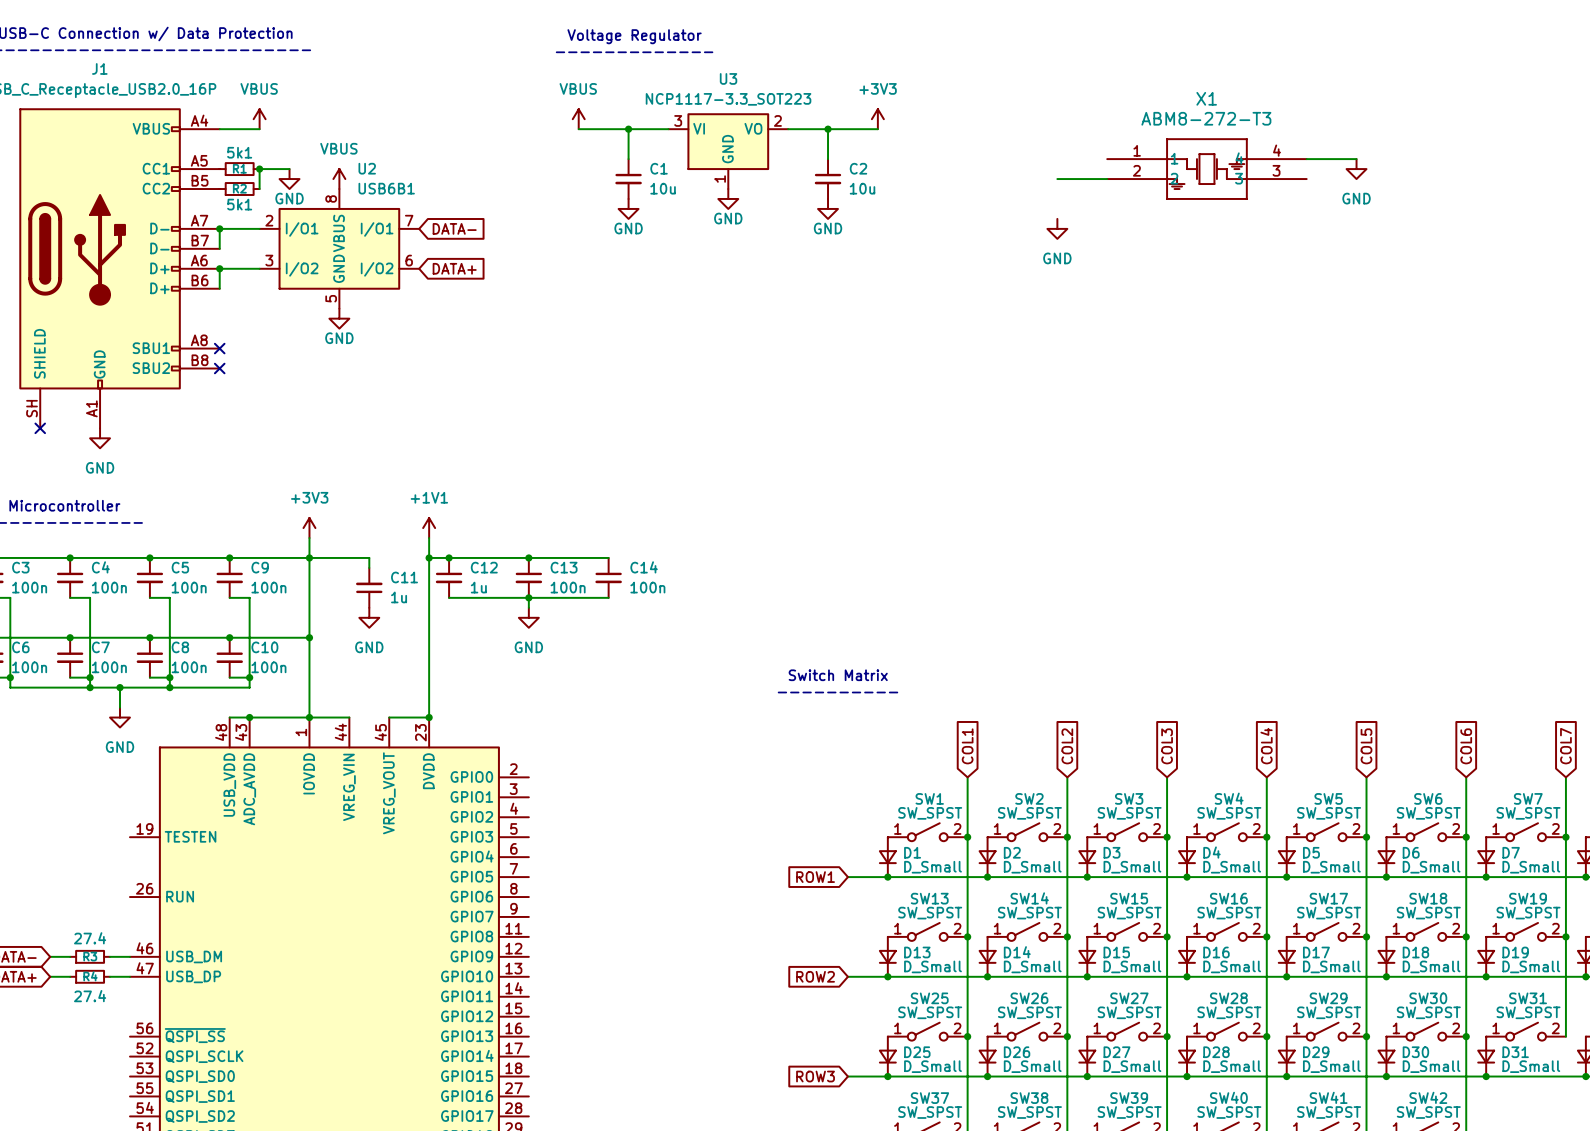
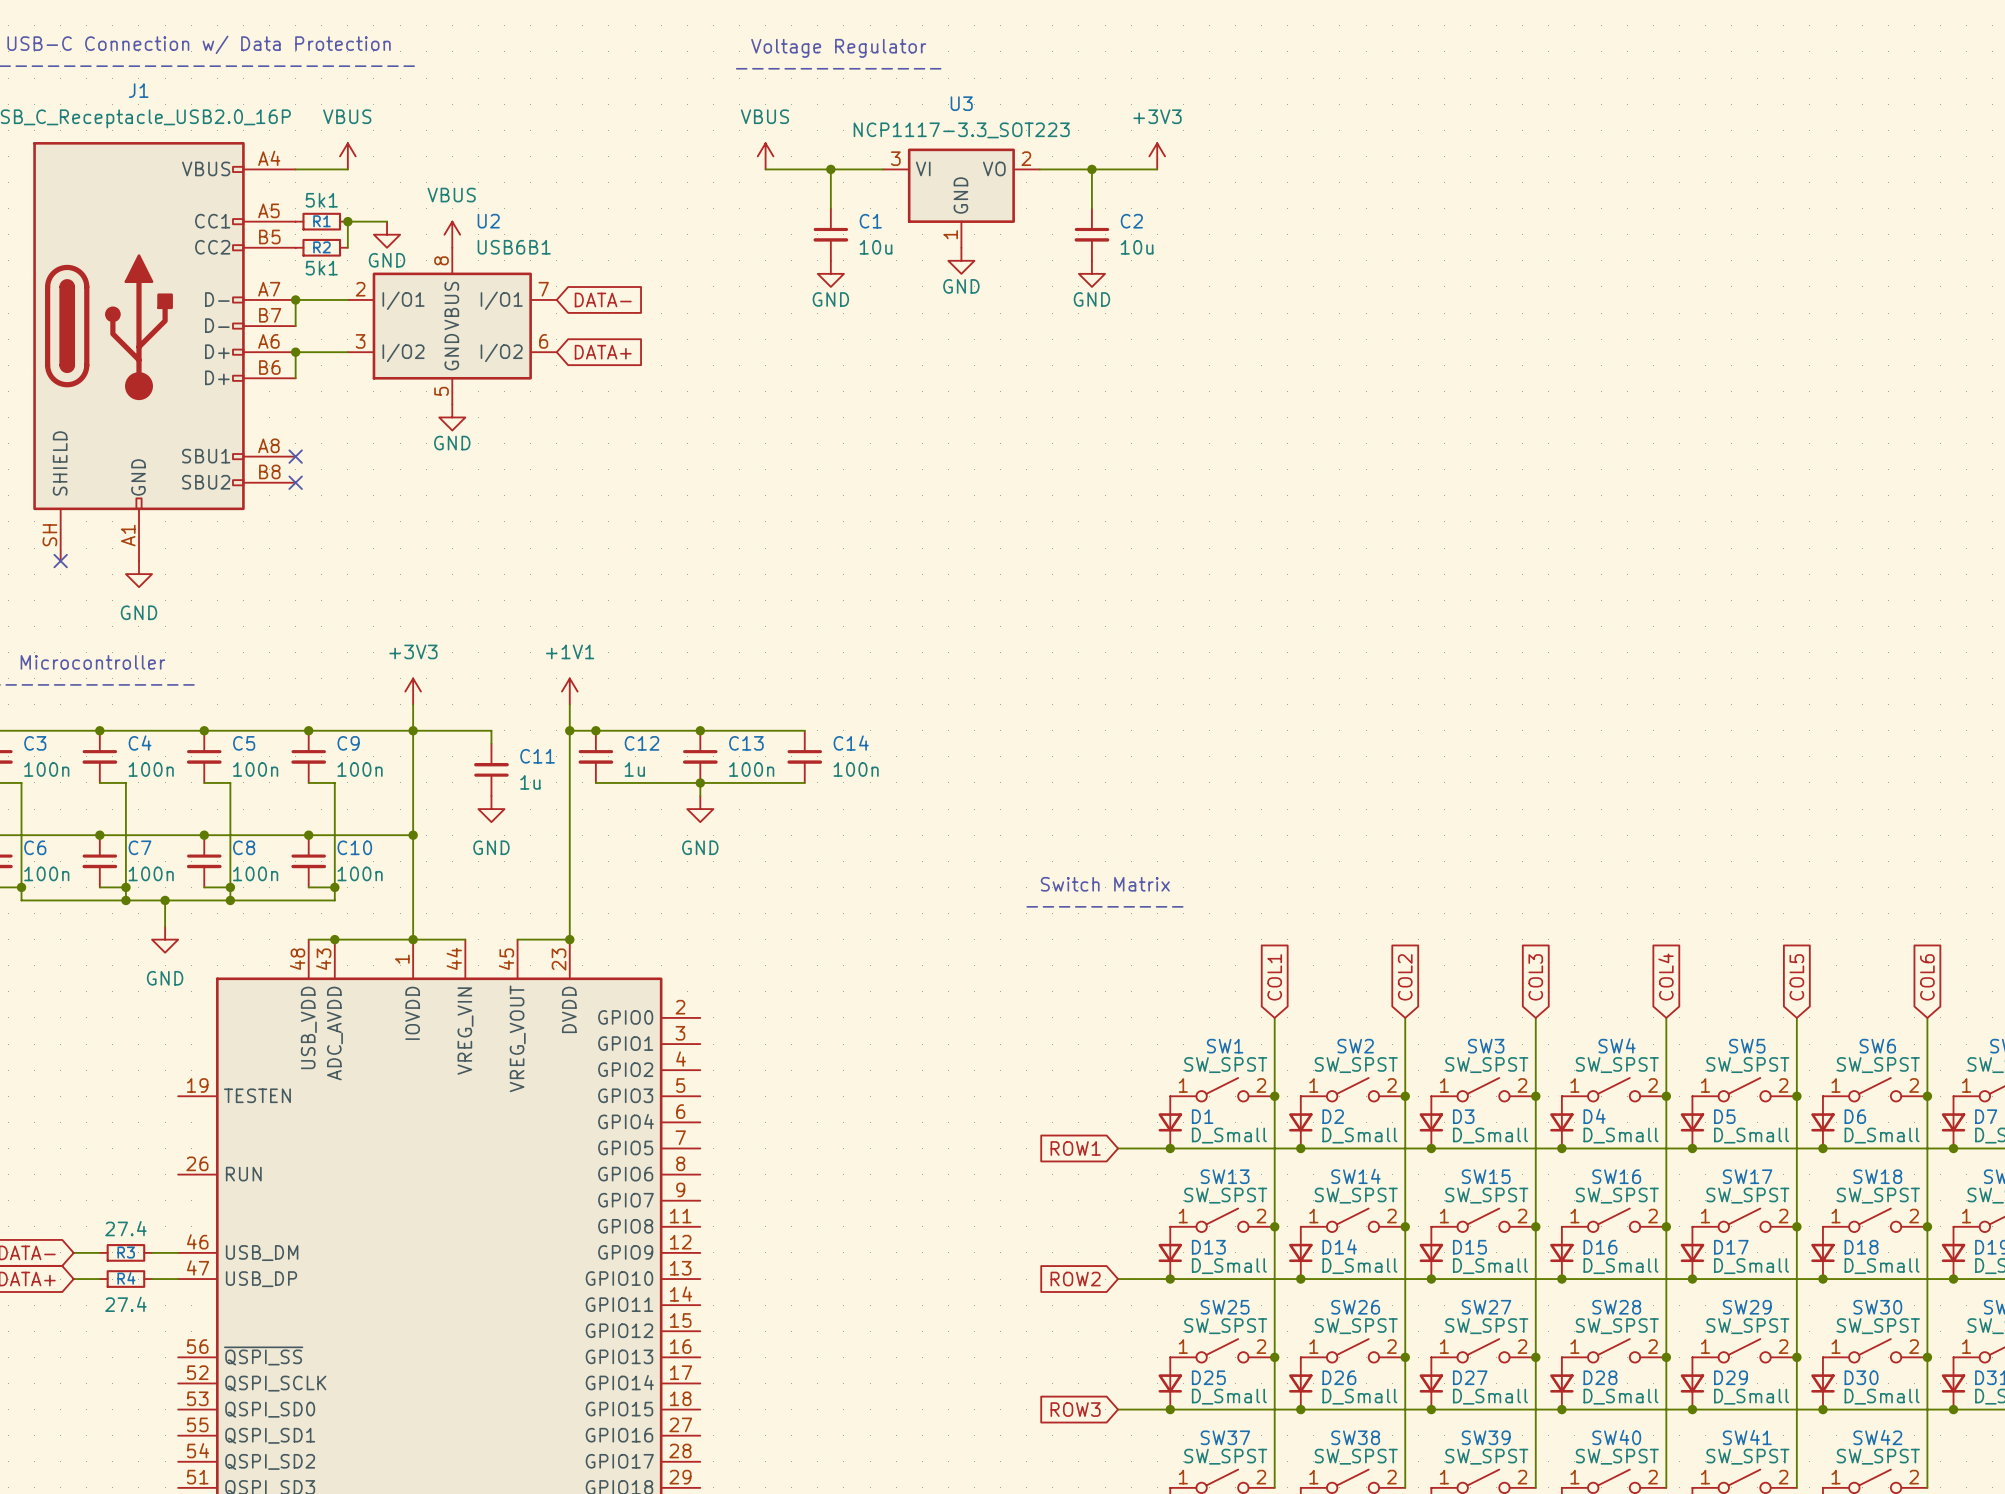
wire: (1306, 159) (1356, 159) -> none
X1: ABM8-272-T3 (1206, 169) -> none
power symbol: GND (1356, 169) -> none
wire: (1057, 179) (1107, 179) -> none
power symbol: GND (1057, 228) -> none

